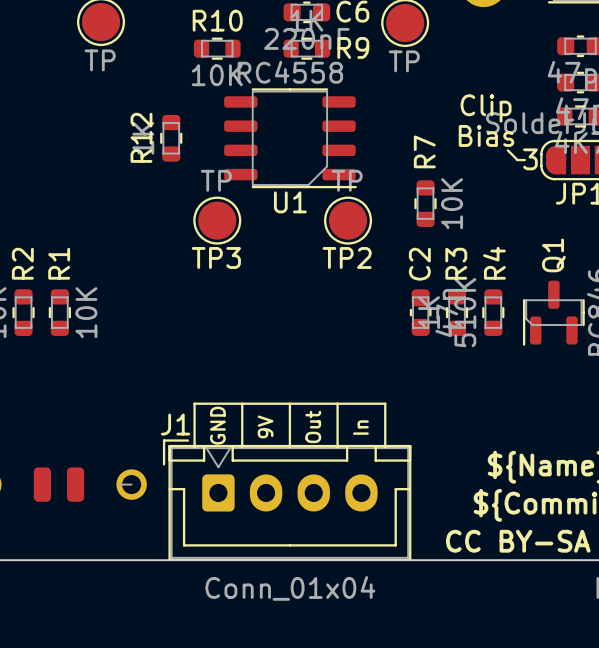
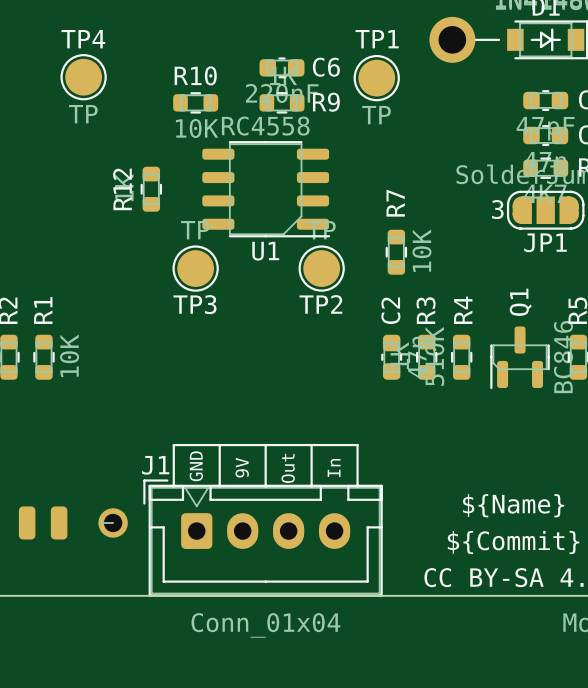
text: Clip (486, 108) -> none
text: Bias (486, 135) -> none
line: (507, 150) (517, 160) (524, 160) -> none

